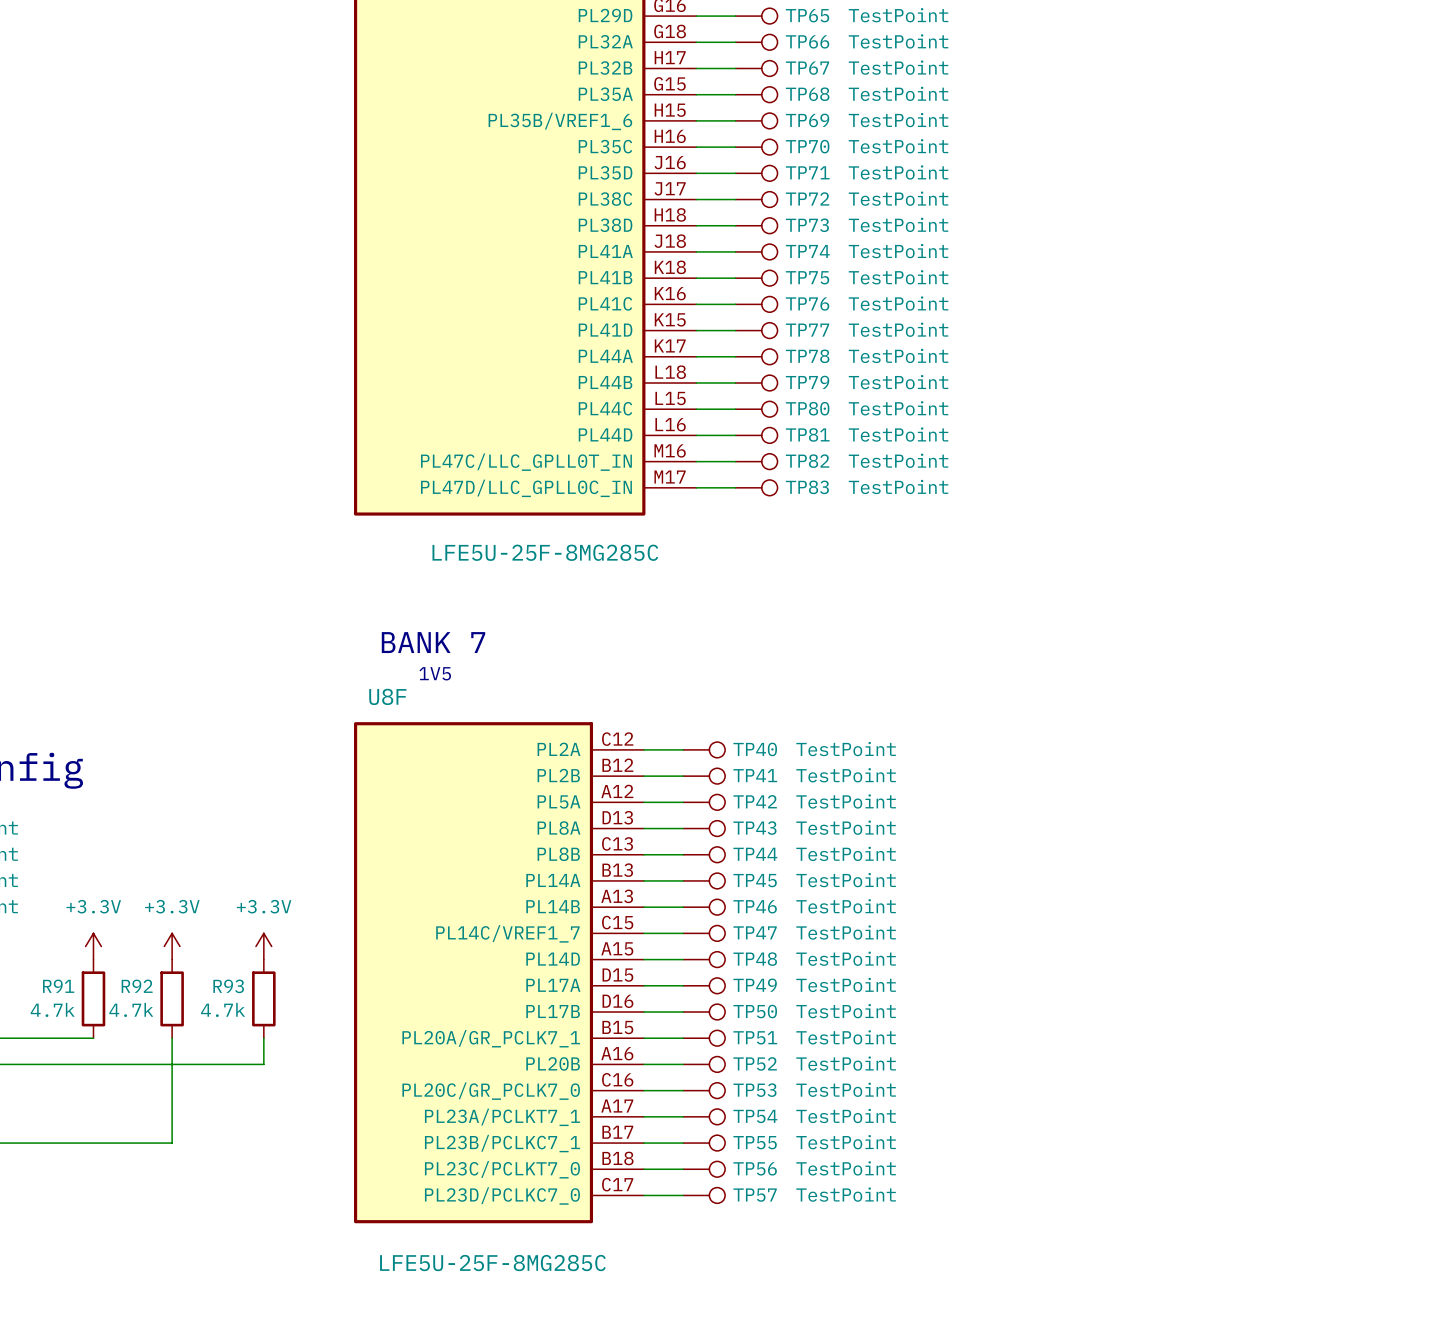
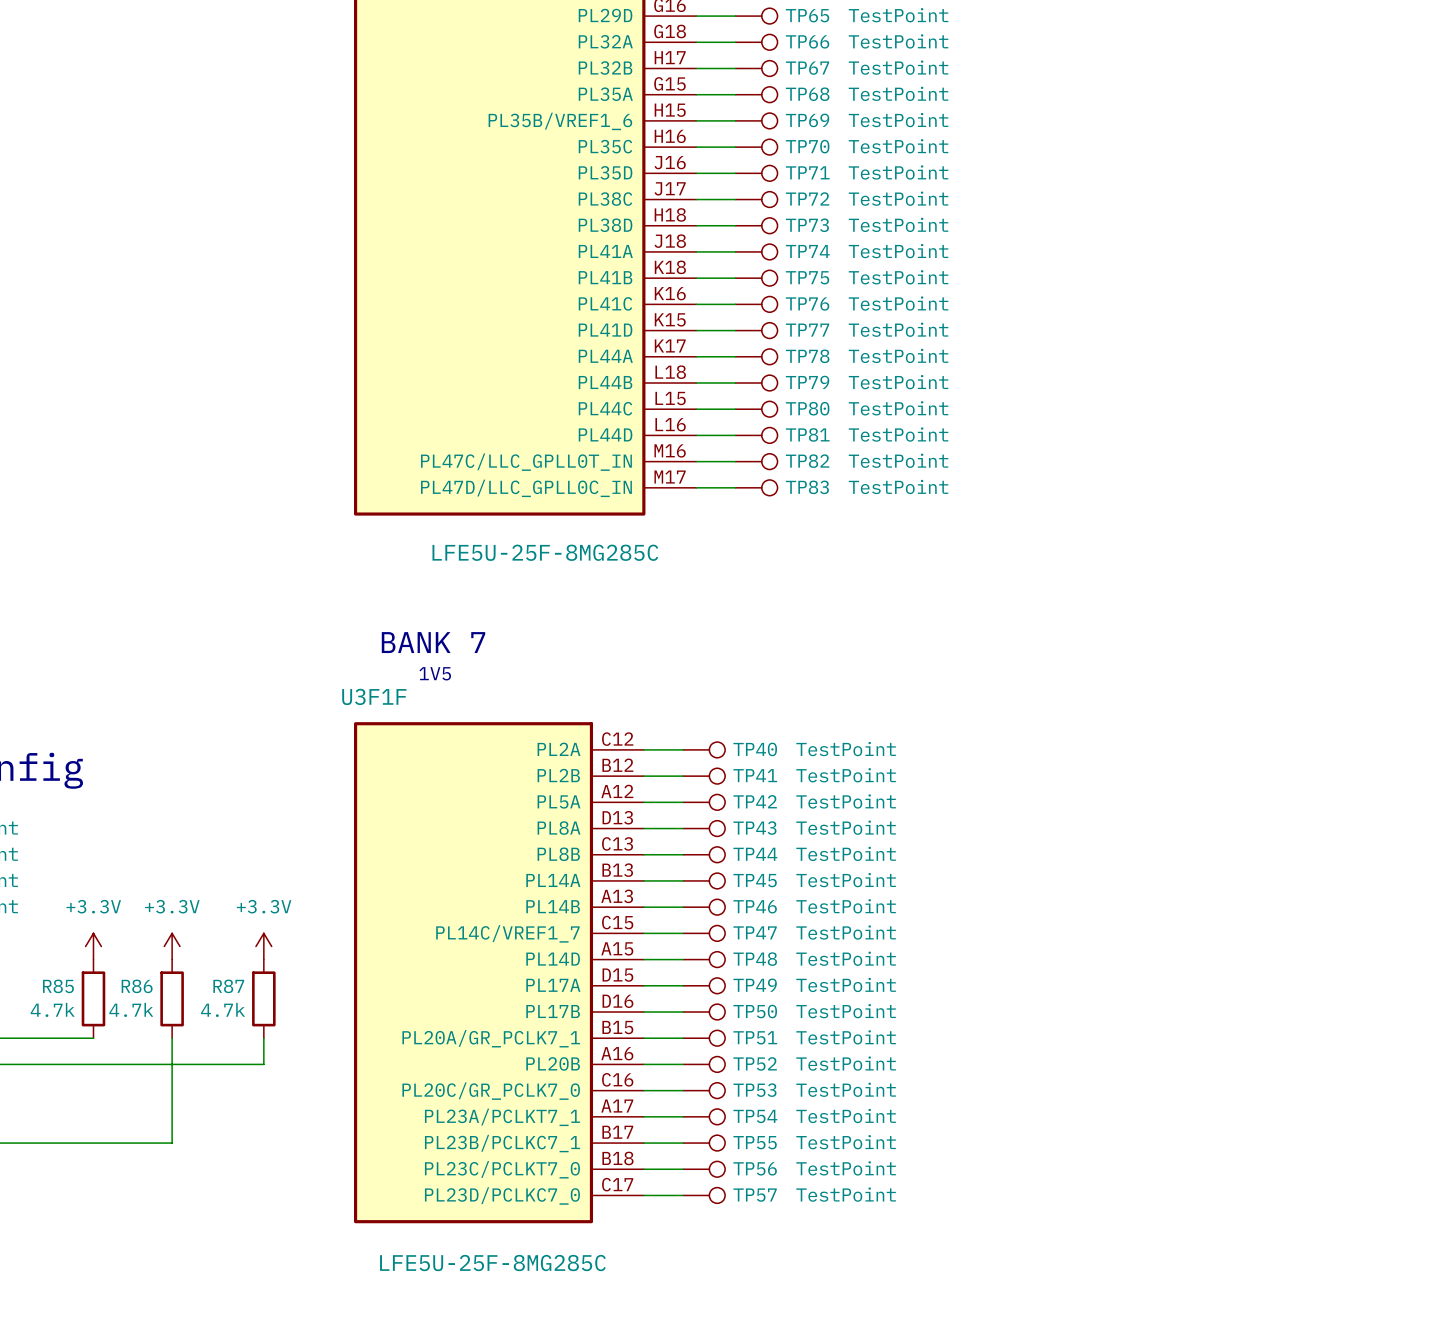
U8F name: U8F (387, 696) -> U3F1F (374, 696)
R91 name: R91 (58, 986) -> R85 (58, 986)
R92 name: R92 (137, 986) -> R86 (137, 986)
R93 name: R93 (228, 986) -> R87 (228, 986)

